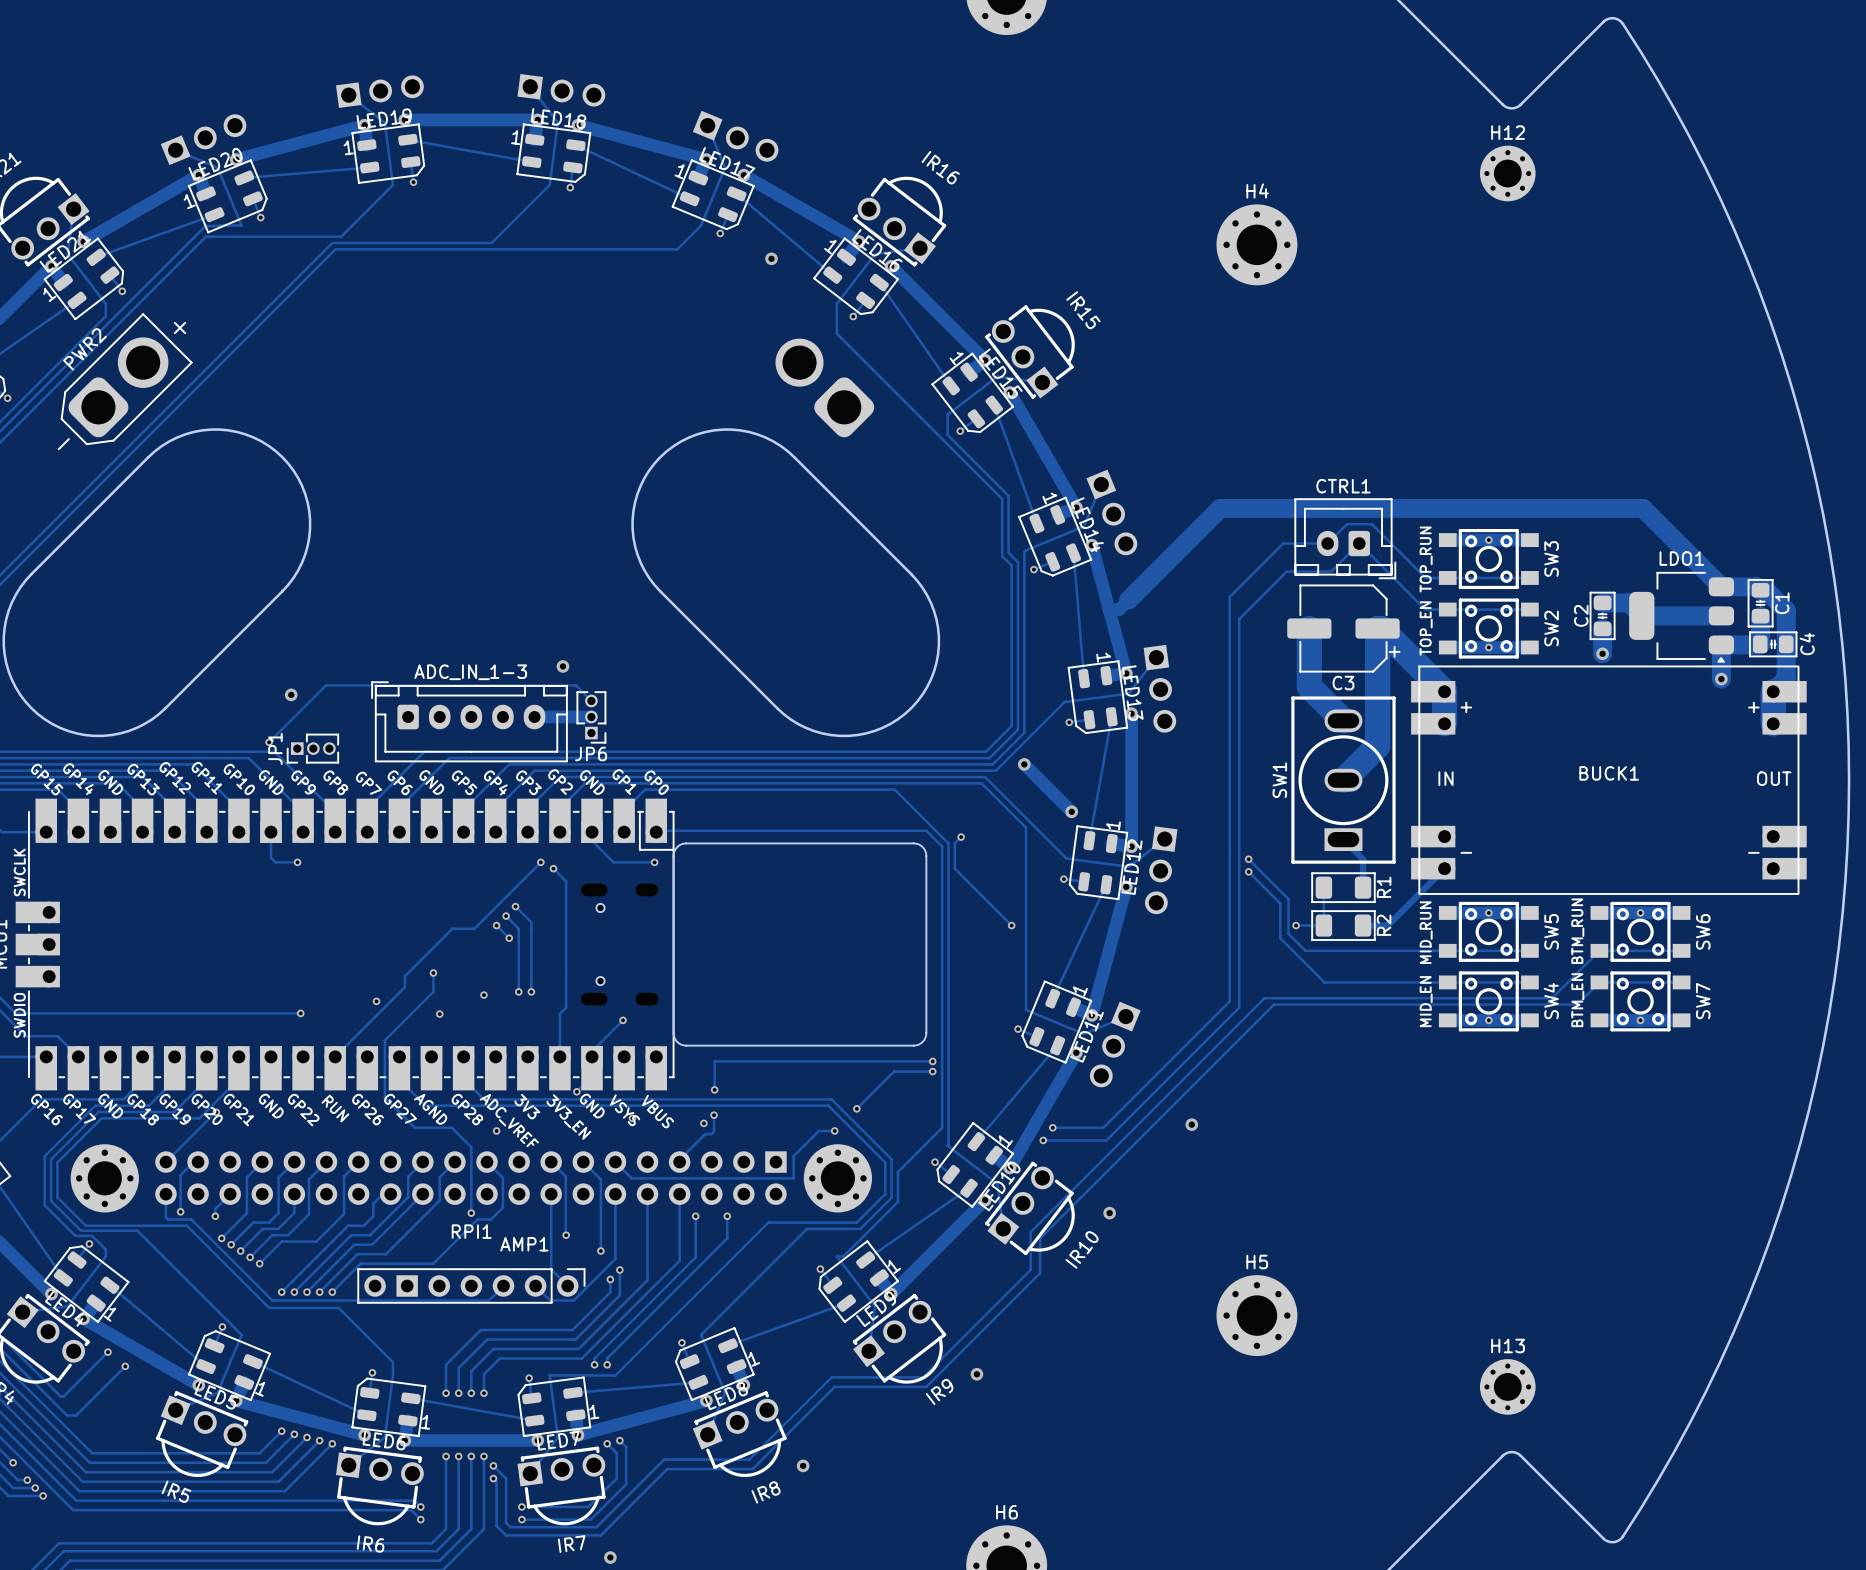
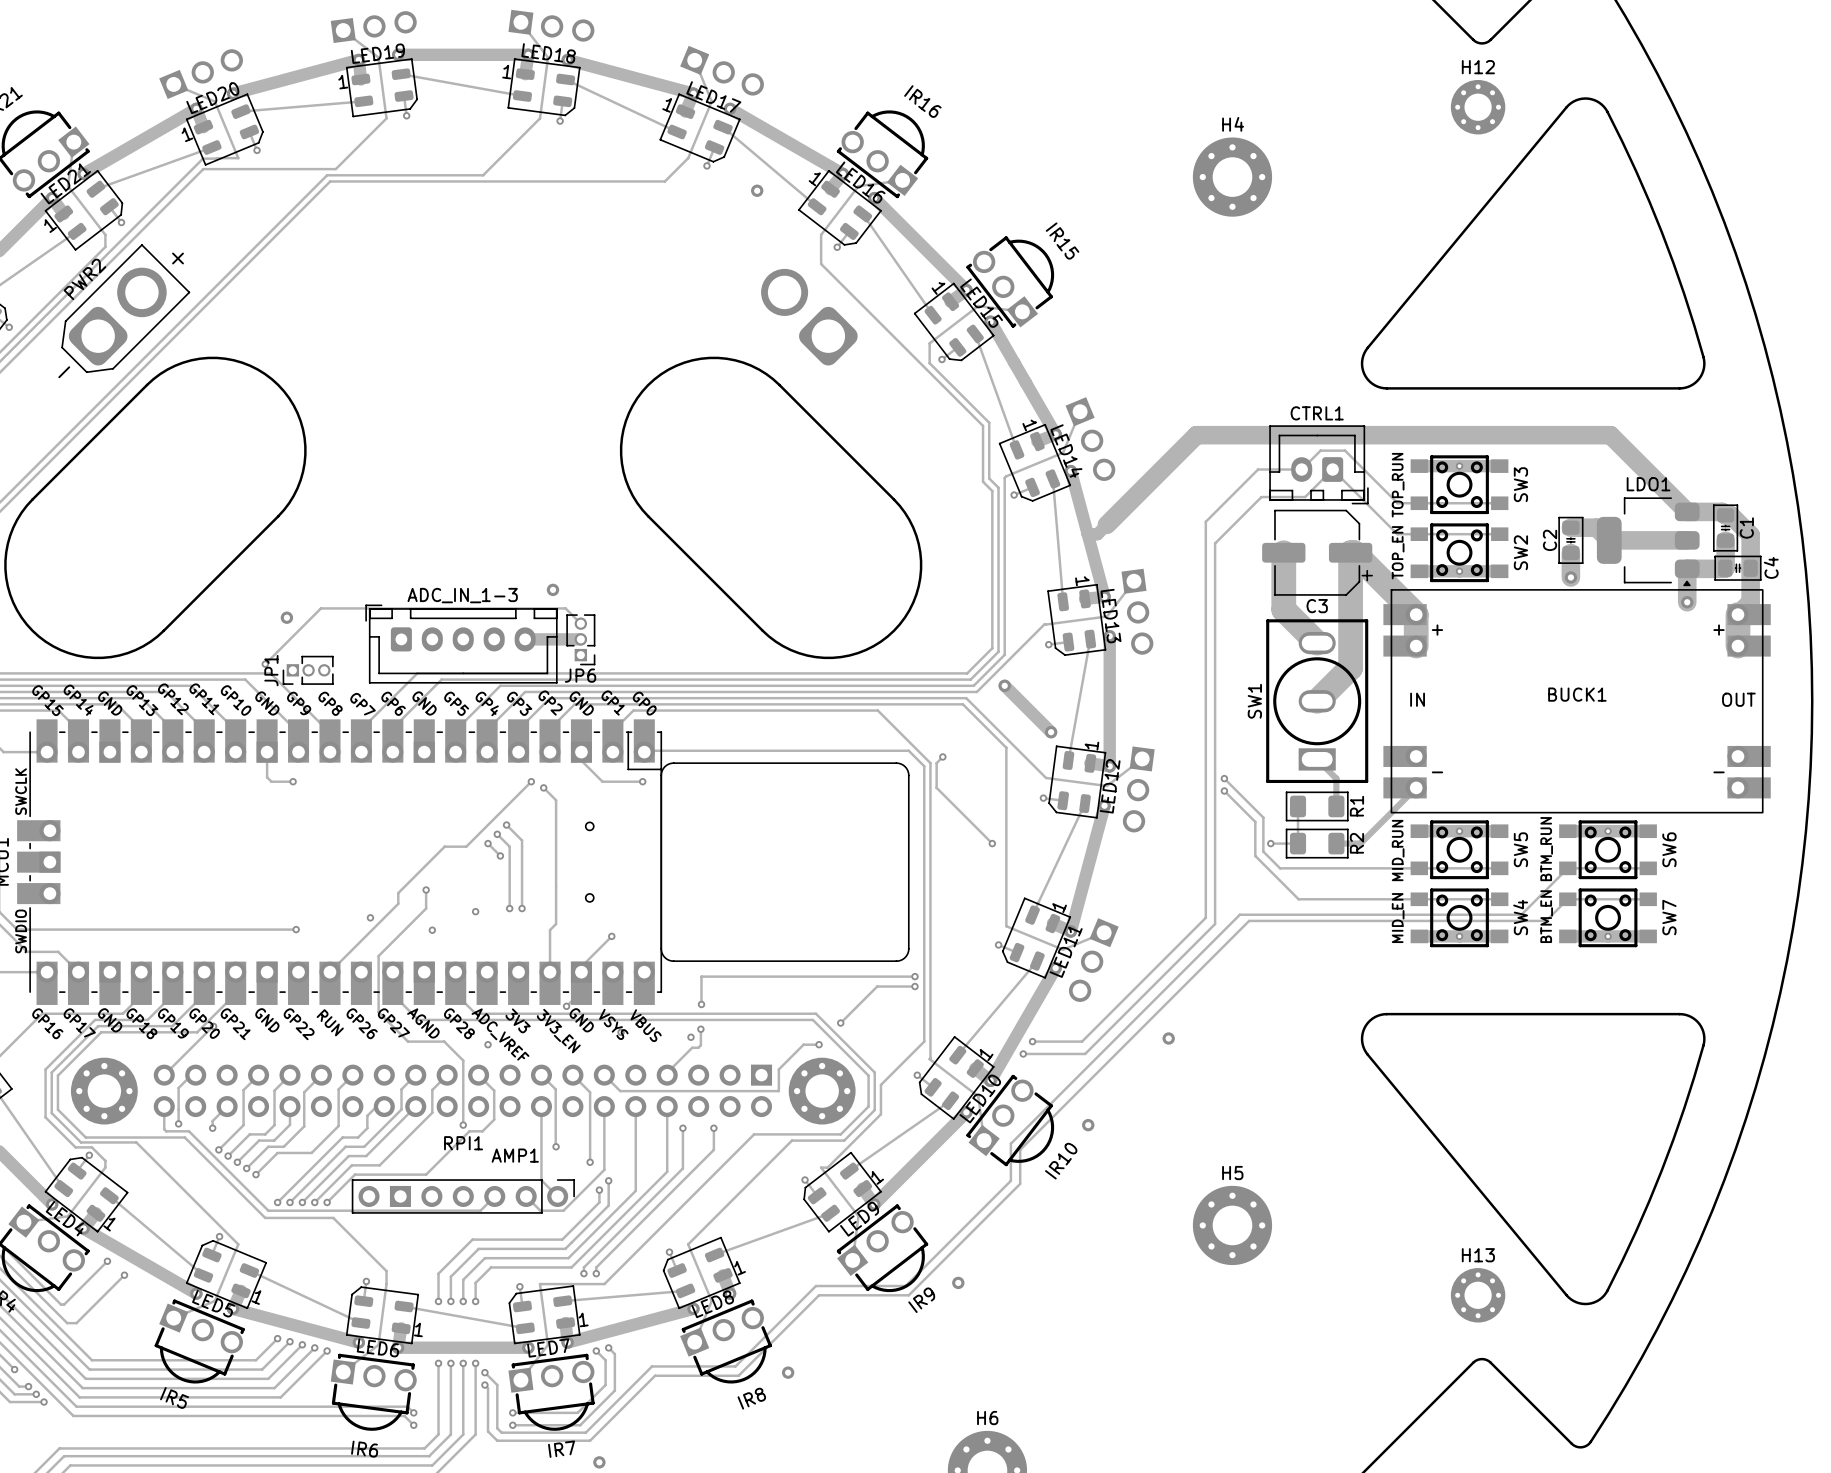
board edge: none -> (1566, 107) (1365, 350) (1362, 358) (1362, 368) (1365, 376) (1372, 383) (1386, 388) (1679, 388) (1690, 385) (1699, 378) (1703, 368) (1704, 359) (1684, 293) (1661, 232) (1622, 141) (1607, 111) (1599, 102) (1591, 99) (1582, 98) (1573, 101) (1566, 107)
board edge: none -> (1386, 1014) (1679, 1014) (1690, 1016) (1699, 1023) (1703, 1034) (1703, 1045) (1673, 1139) (1636, 1231) (1607, 1290) (1599, 1299) (1585, 1304) (1576, 1302) (1568, 1297) (1367, 1054) (1362, 1043) (1364, 1028) (1372, 1018) (1386, 1014)

